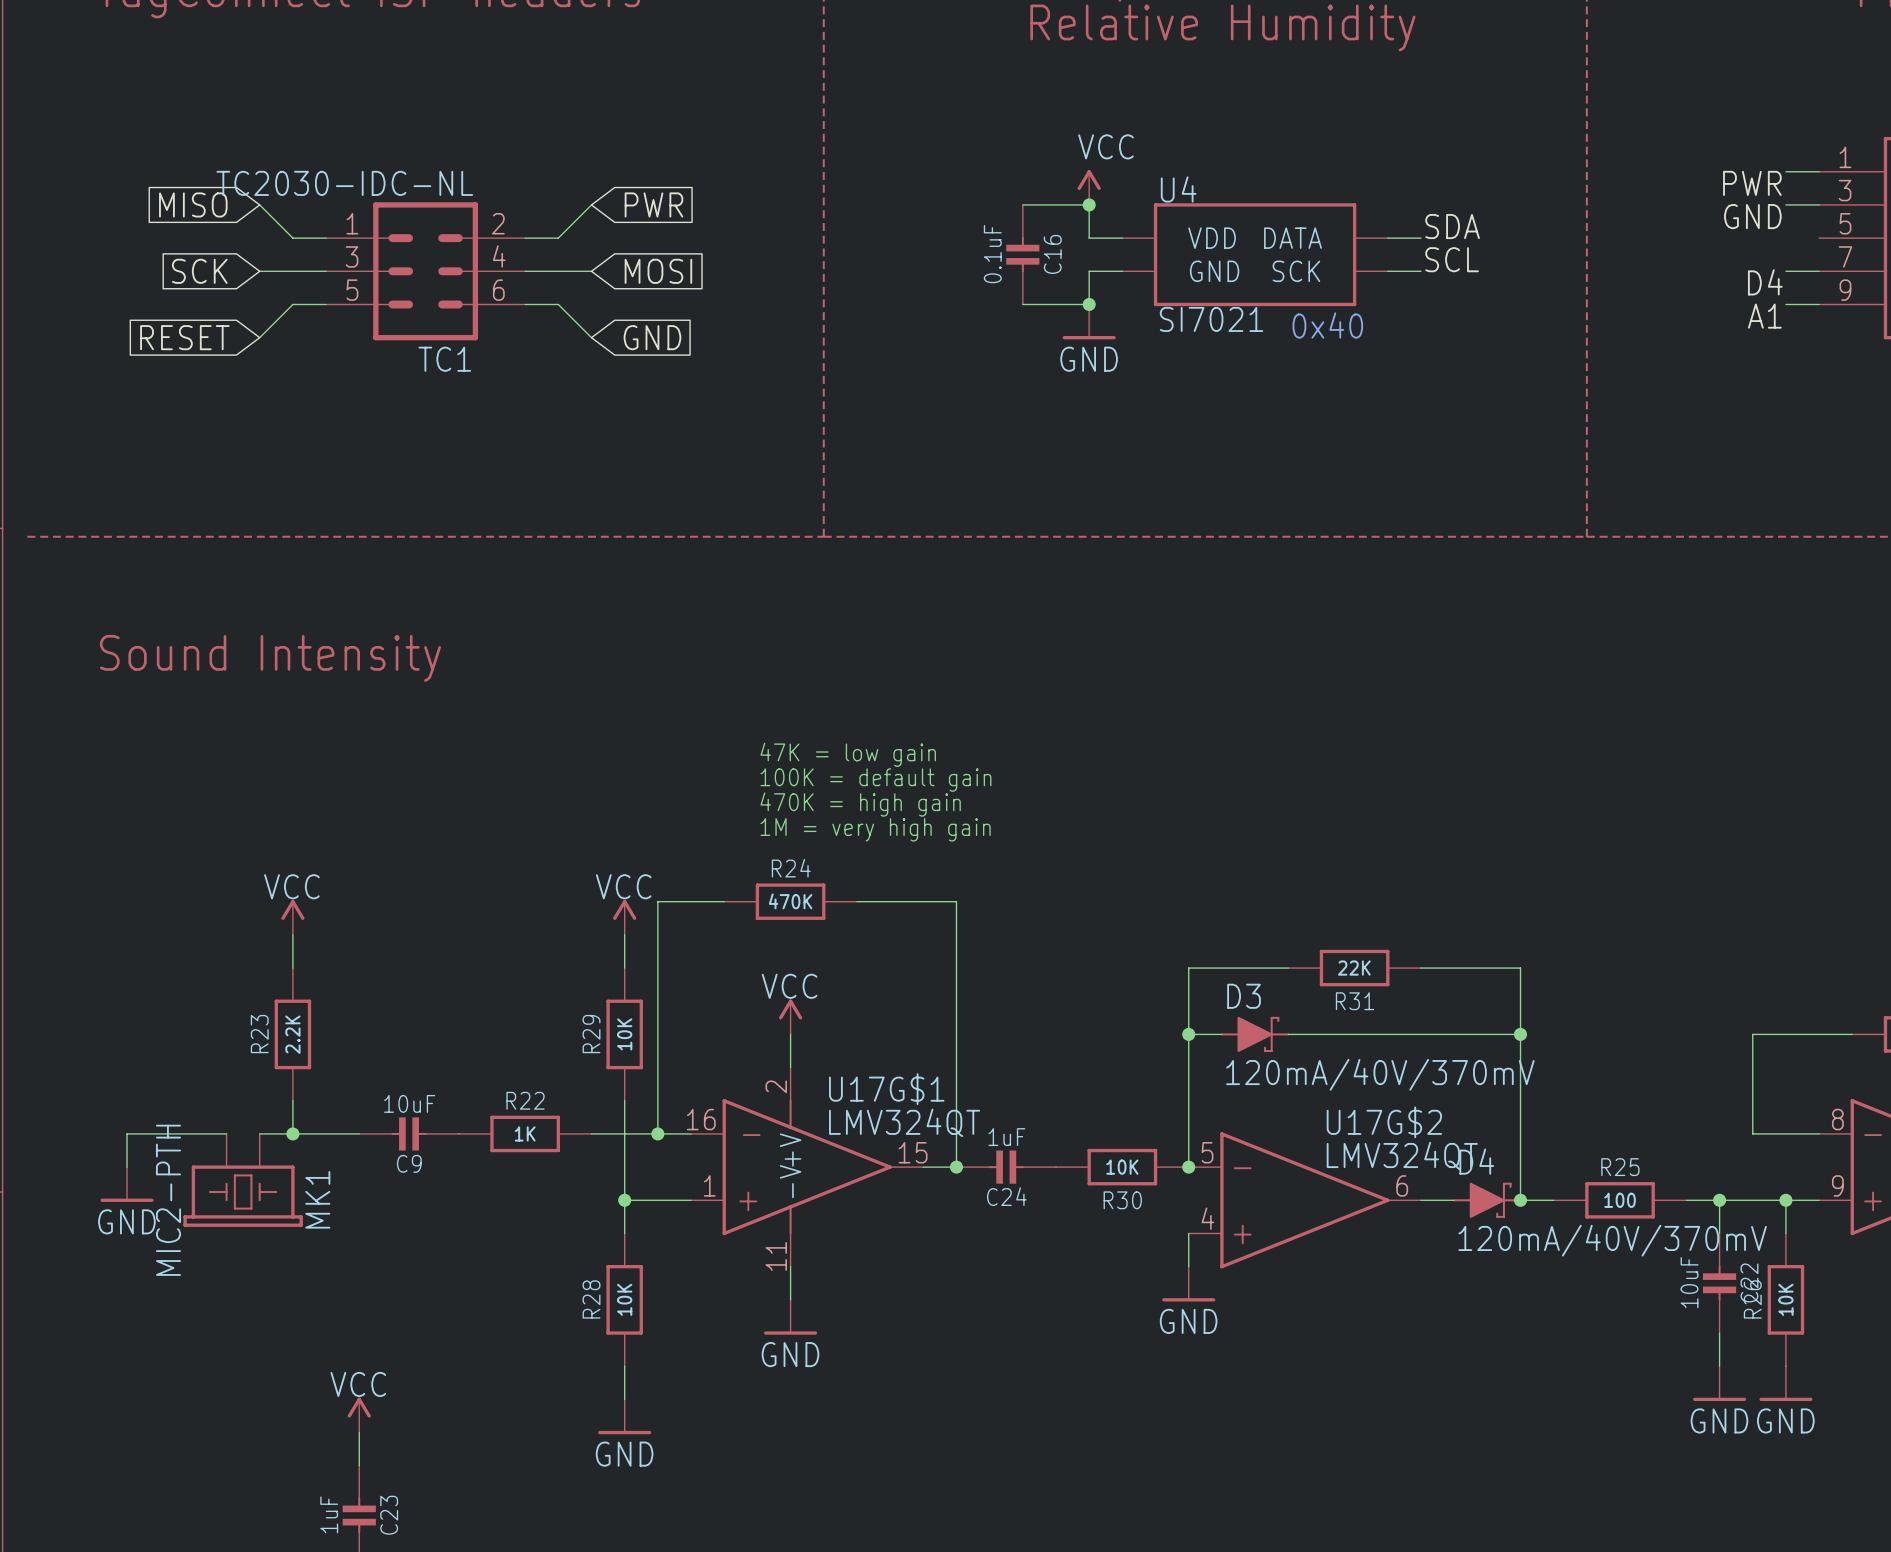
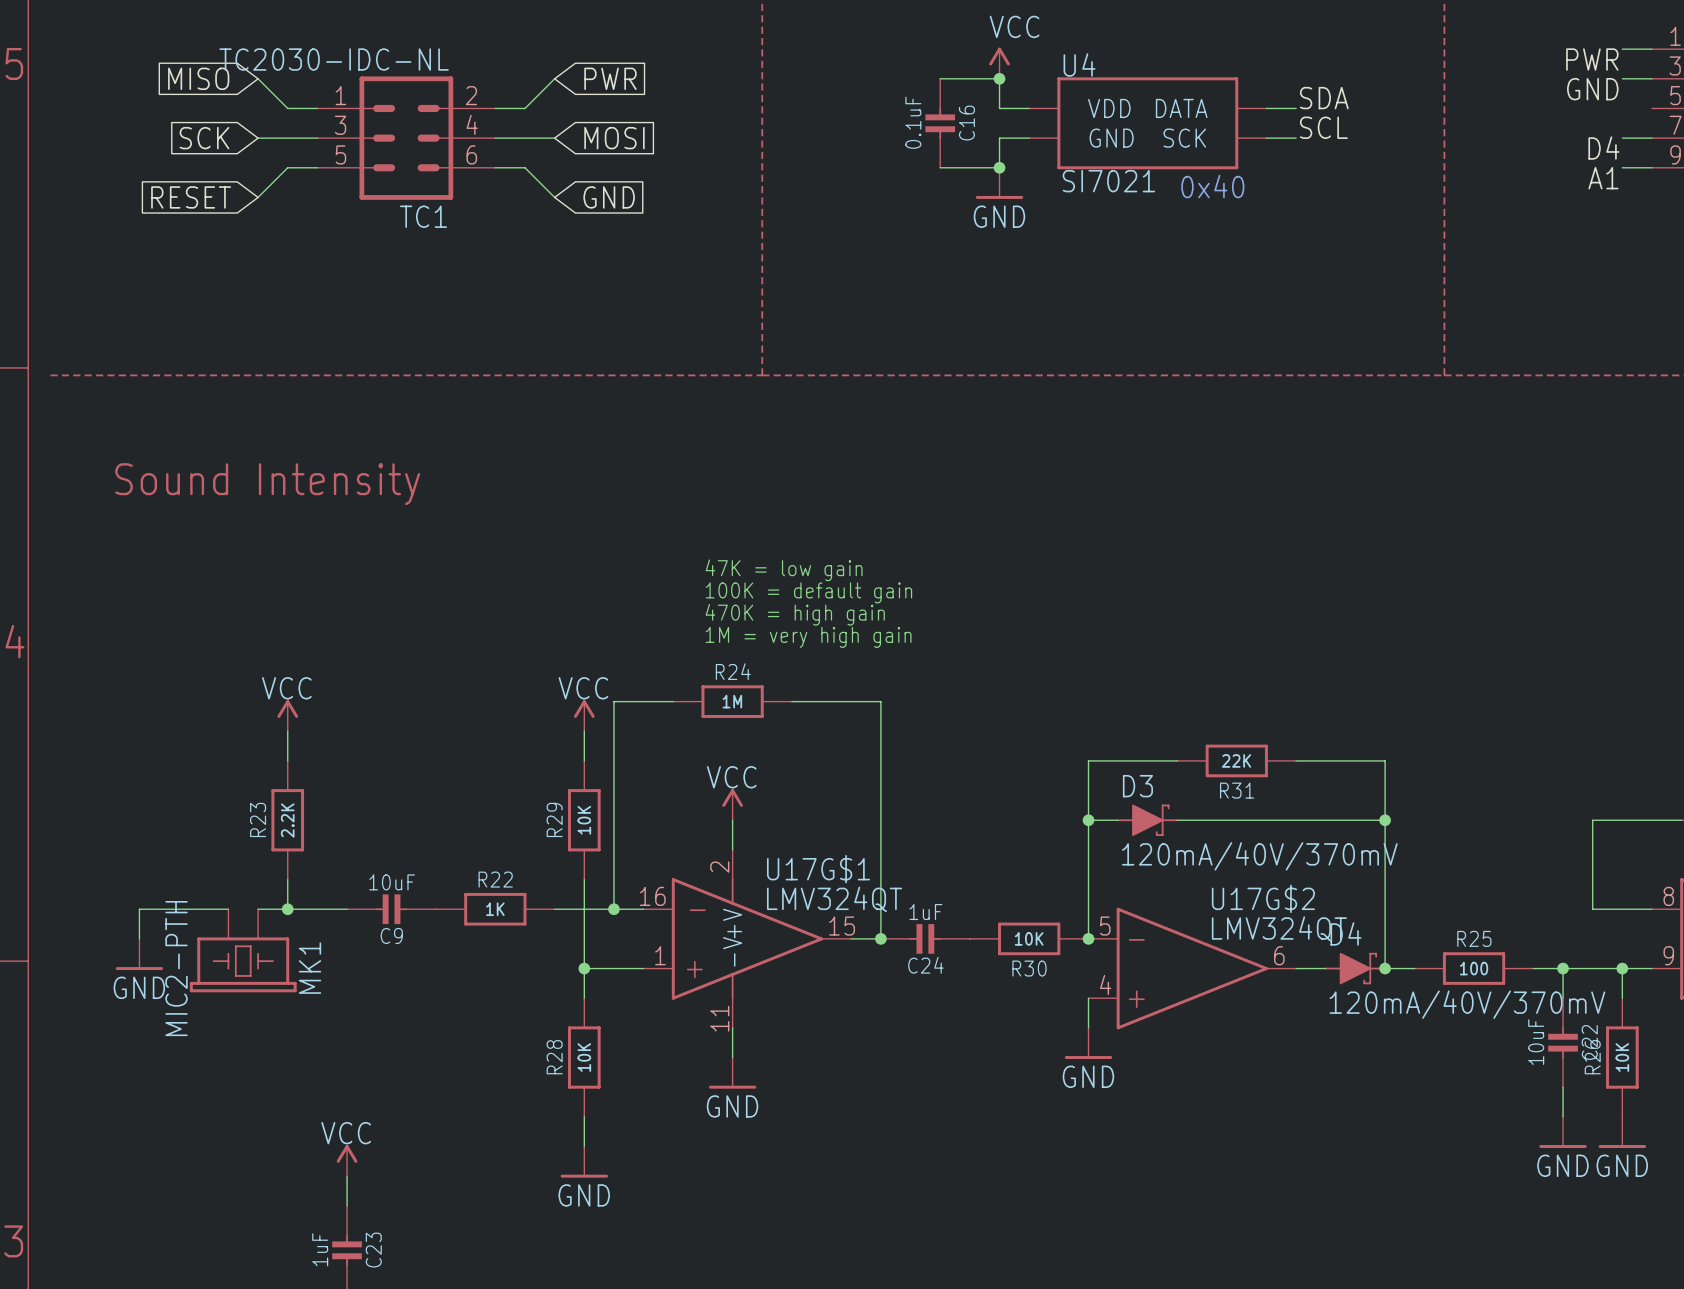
R24 value: 470K (790, 901) -> 1M (732, 701)

